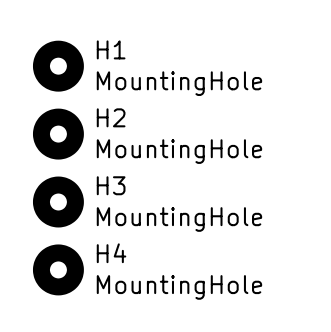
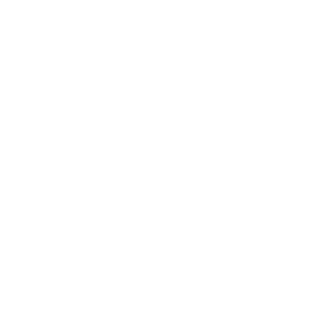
H1: MountingHole (58, 66) -> none
H2: MountingHole (58, 134) -> none
H3: MountingHole (58, 202) -> none
H4: MountingHole (58, 269) -> none

